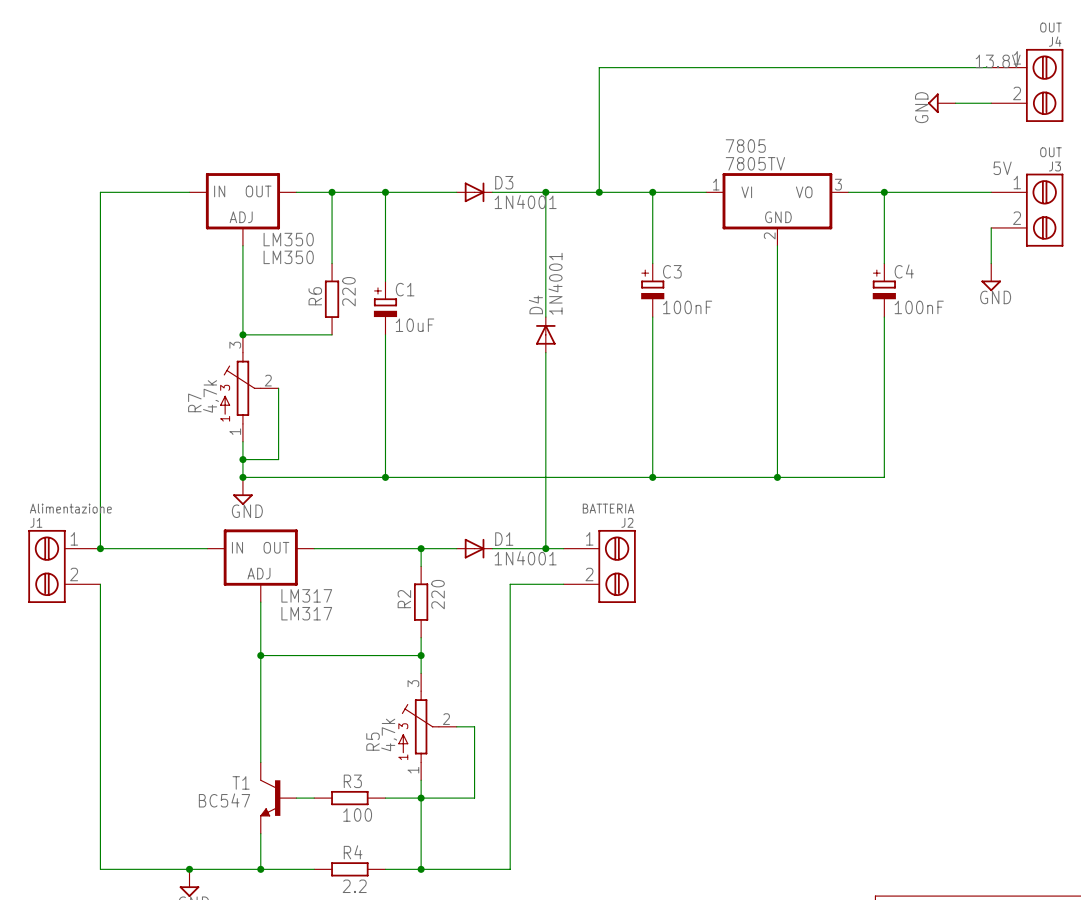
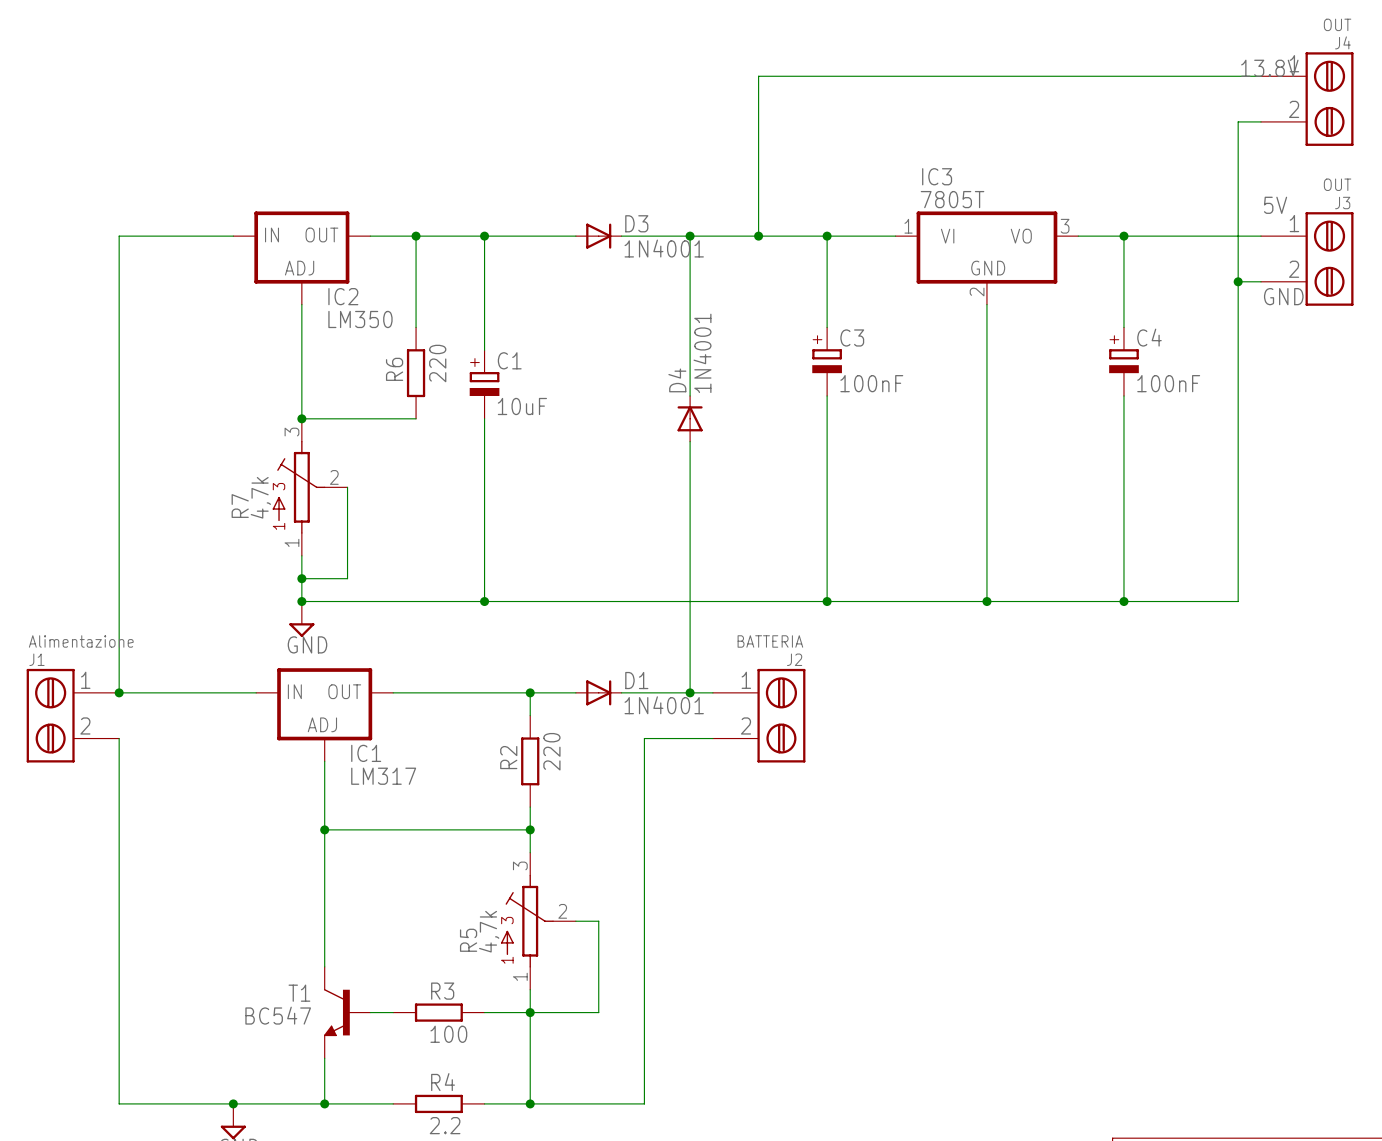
power symbol: GND (941, 103) -> none
wire: (955, 103) (973, 103) -> (1123, 601) (1238, 601) (1238, 121)
7805 name: 7805 (745, 146) -> IC3 (937, 176)
7805 value: 7805TV (755, 163) -> 7805T (952, 199)
junction: none -> (1238, 281)
wire: (991, 227) (991, 263) -> (1261, 281) (1238, 281)
LM350 name: LM350 (288, 239) -> IC2 (343, 296)
label: none -> GND (1283, 296)
power symbol: GND (991, 277) -> none
junction: none -> (1123, 601)
LM317 name: LM317 (306, 595) -> IC1 (366, 753)

